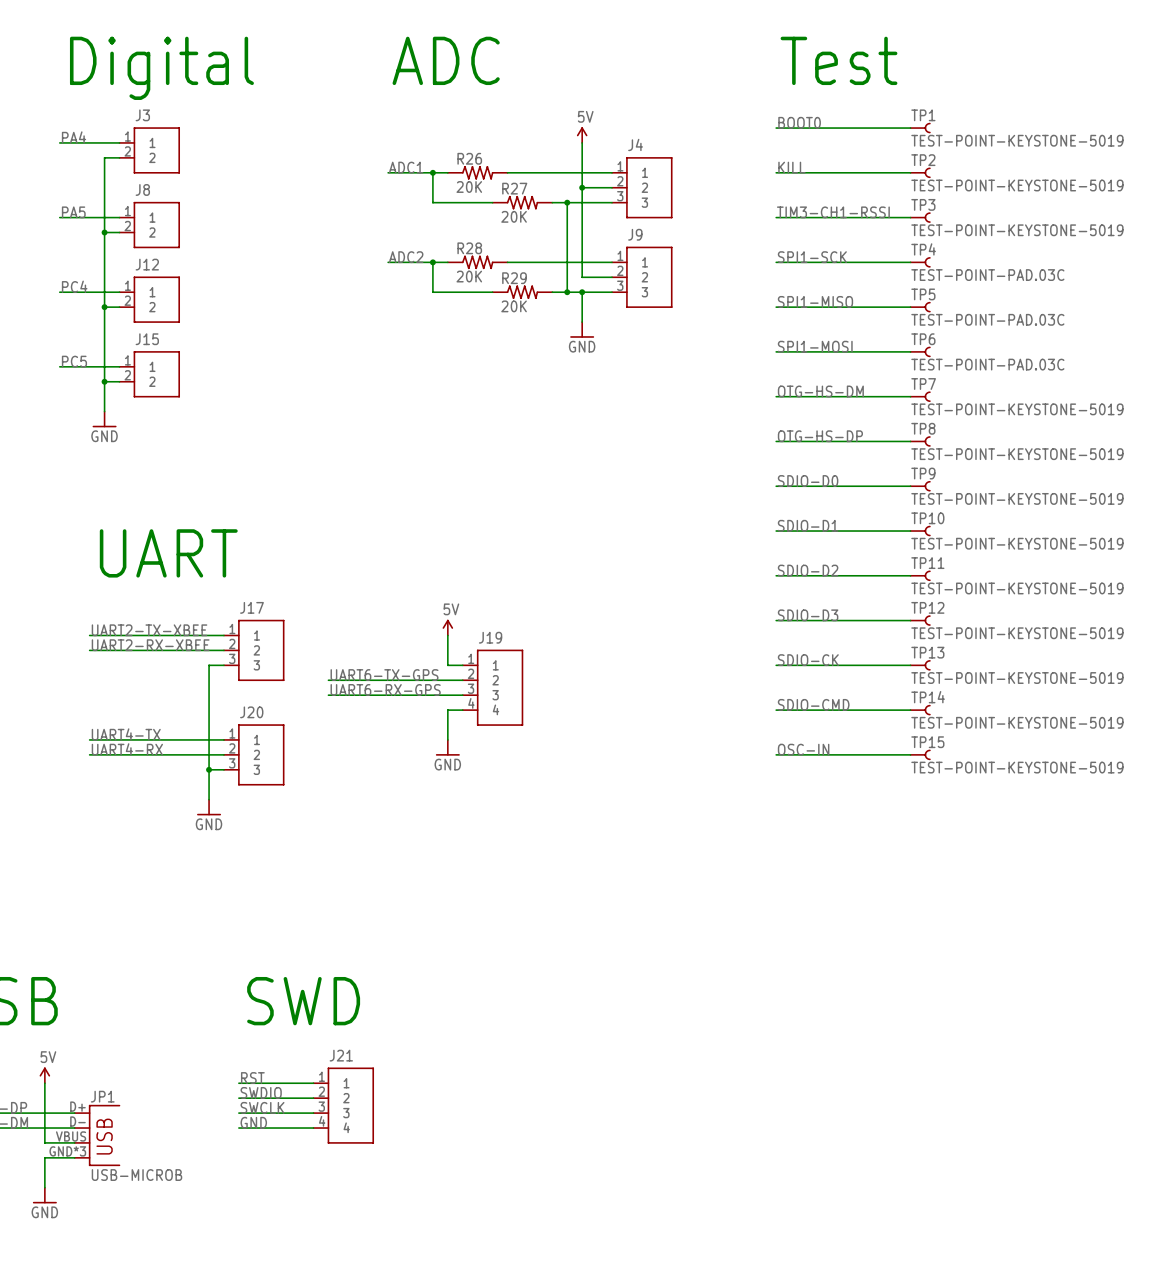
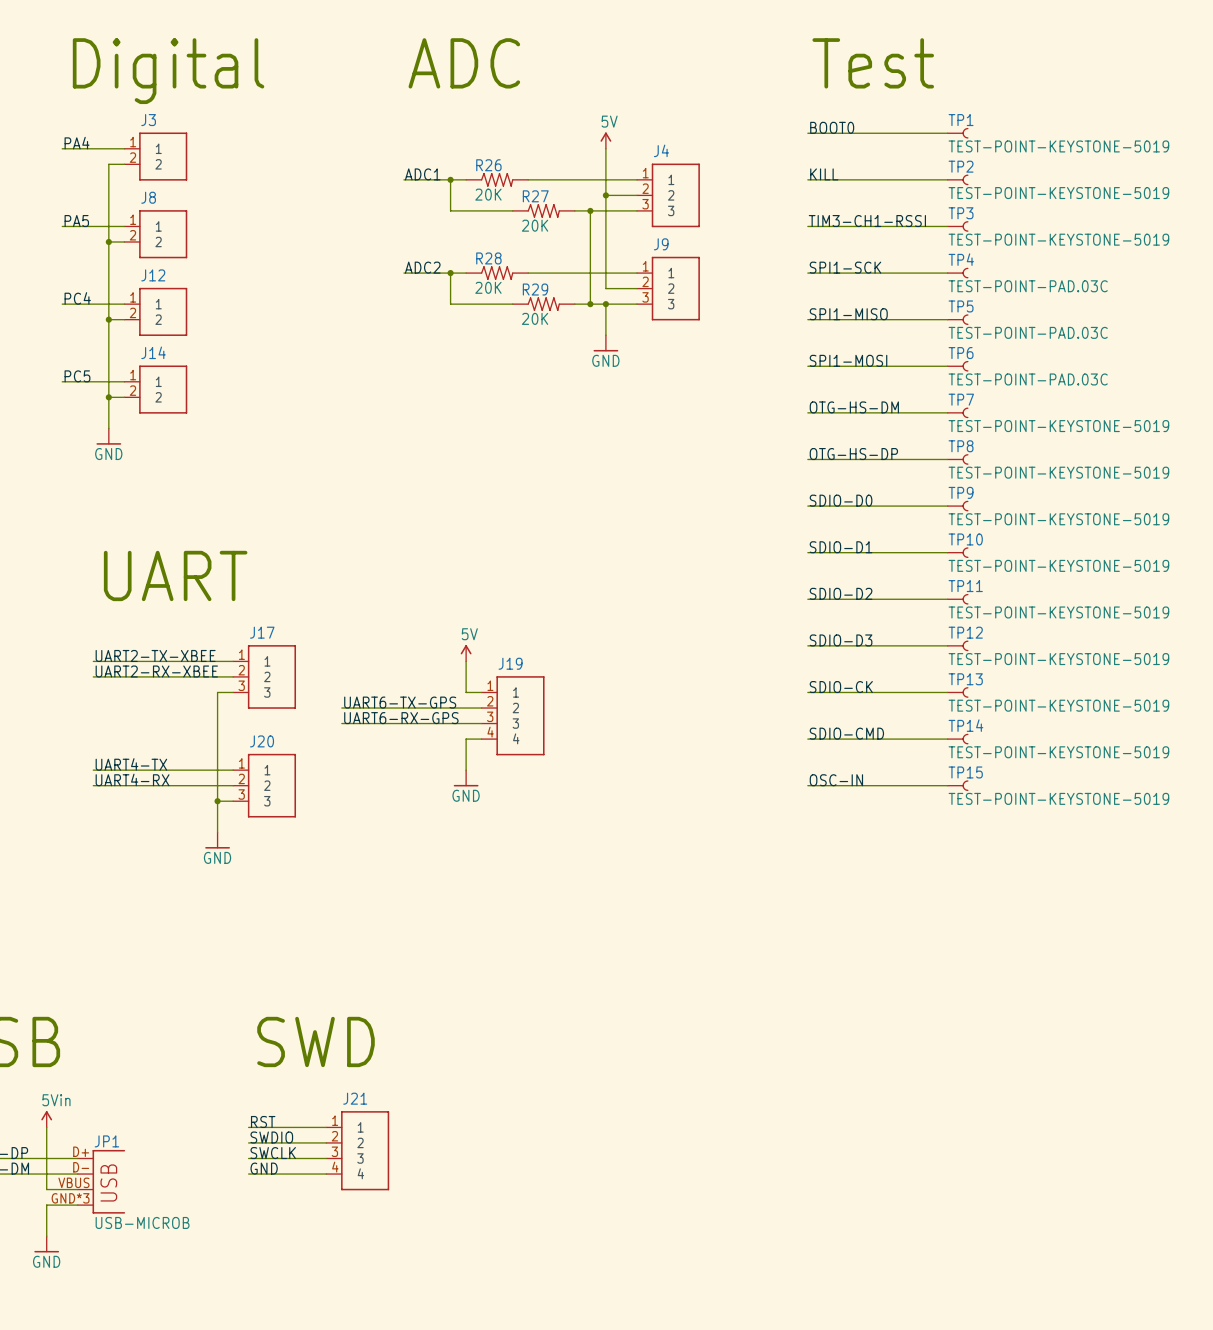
J15 name: J15 (147, 339) -> J14 (153, 352)
power symbol: 5V (44, 1075) -> 5Vin (46, 1119)

